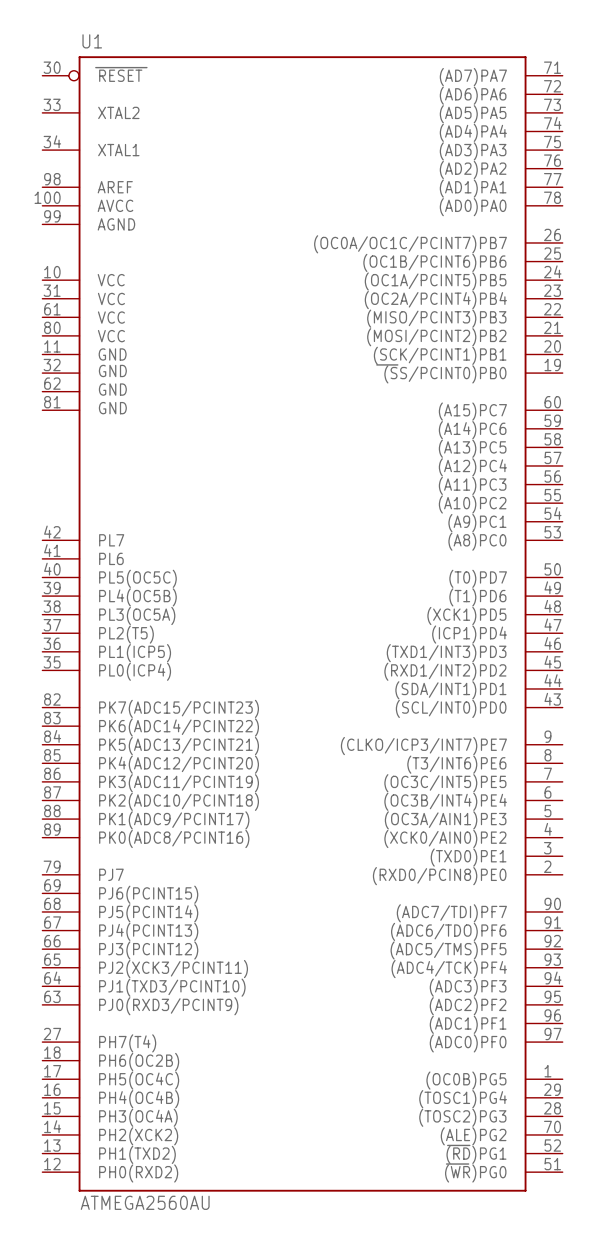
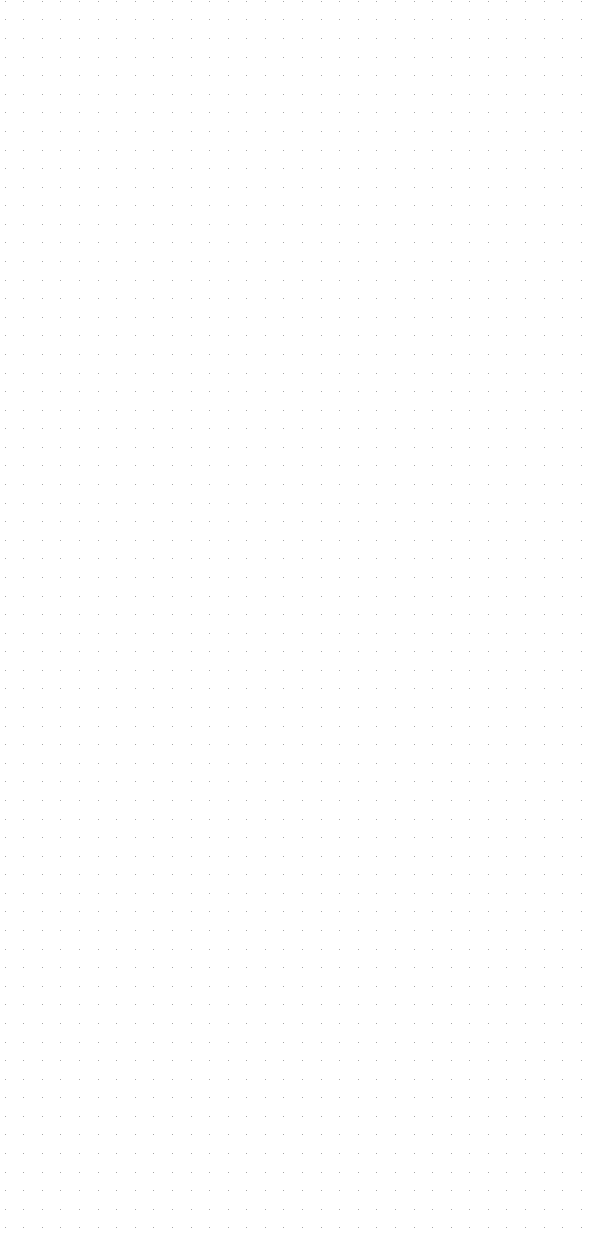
U1: ATMEGA2560AU (302, 623) -> none

